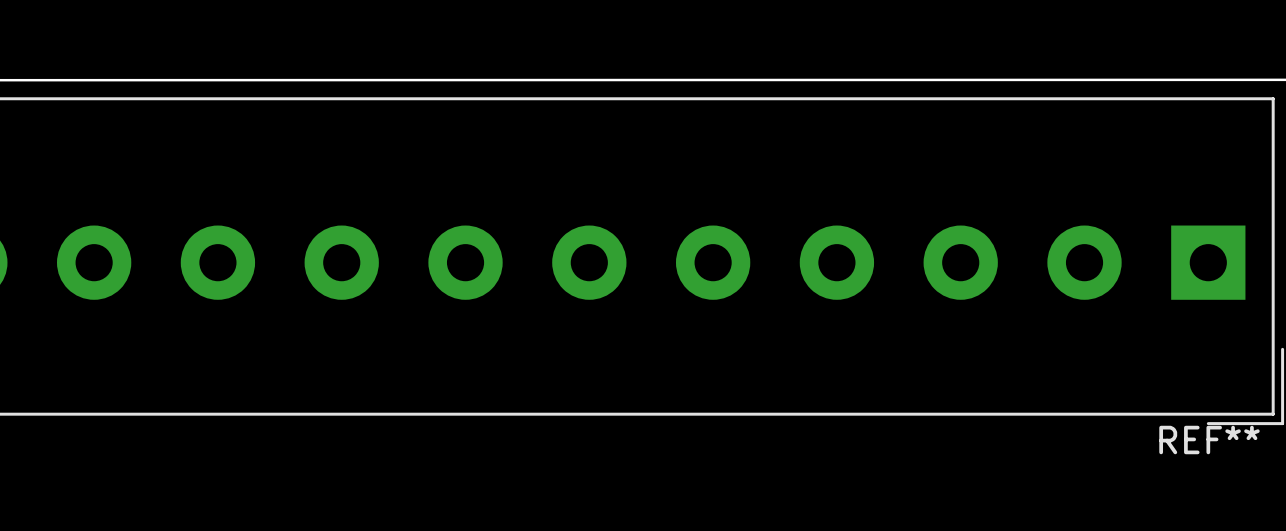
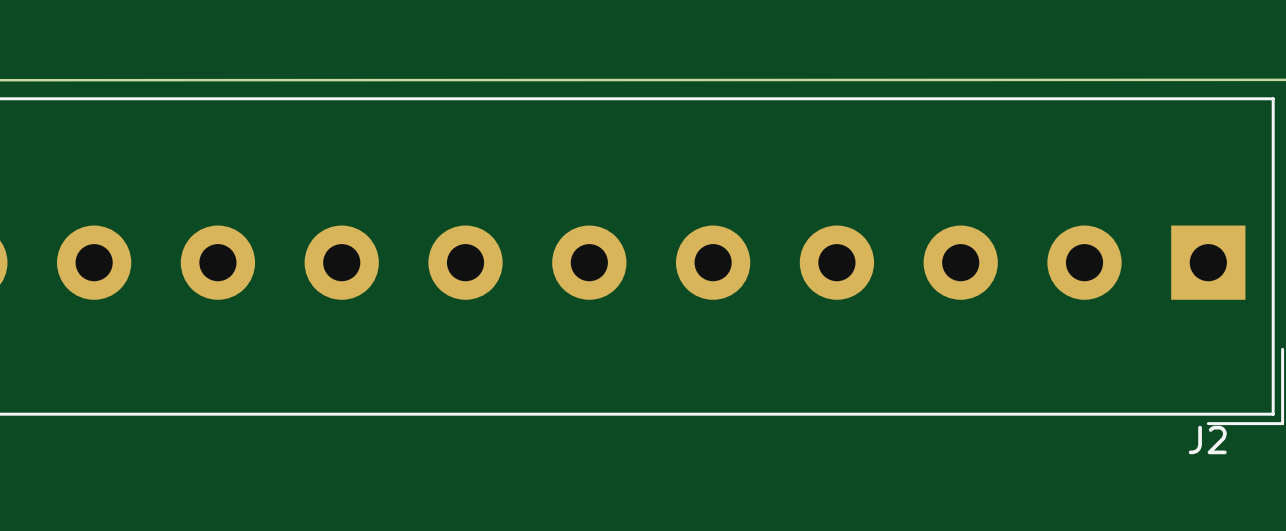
REF** name: REF** (1209, 440) -> J2 (1207, 440)

